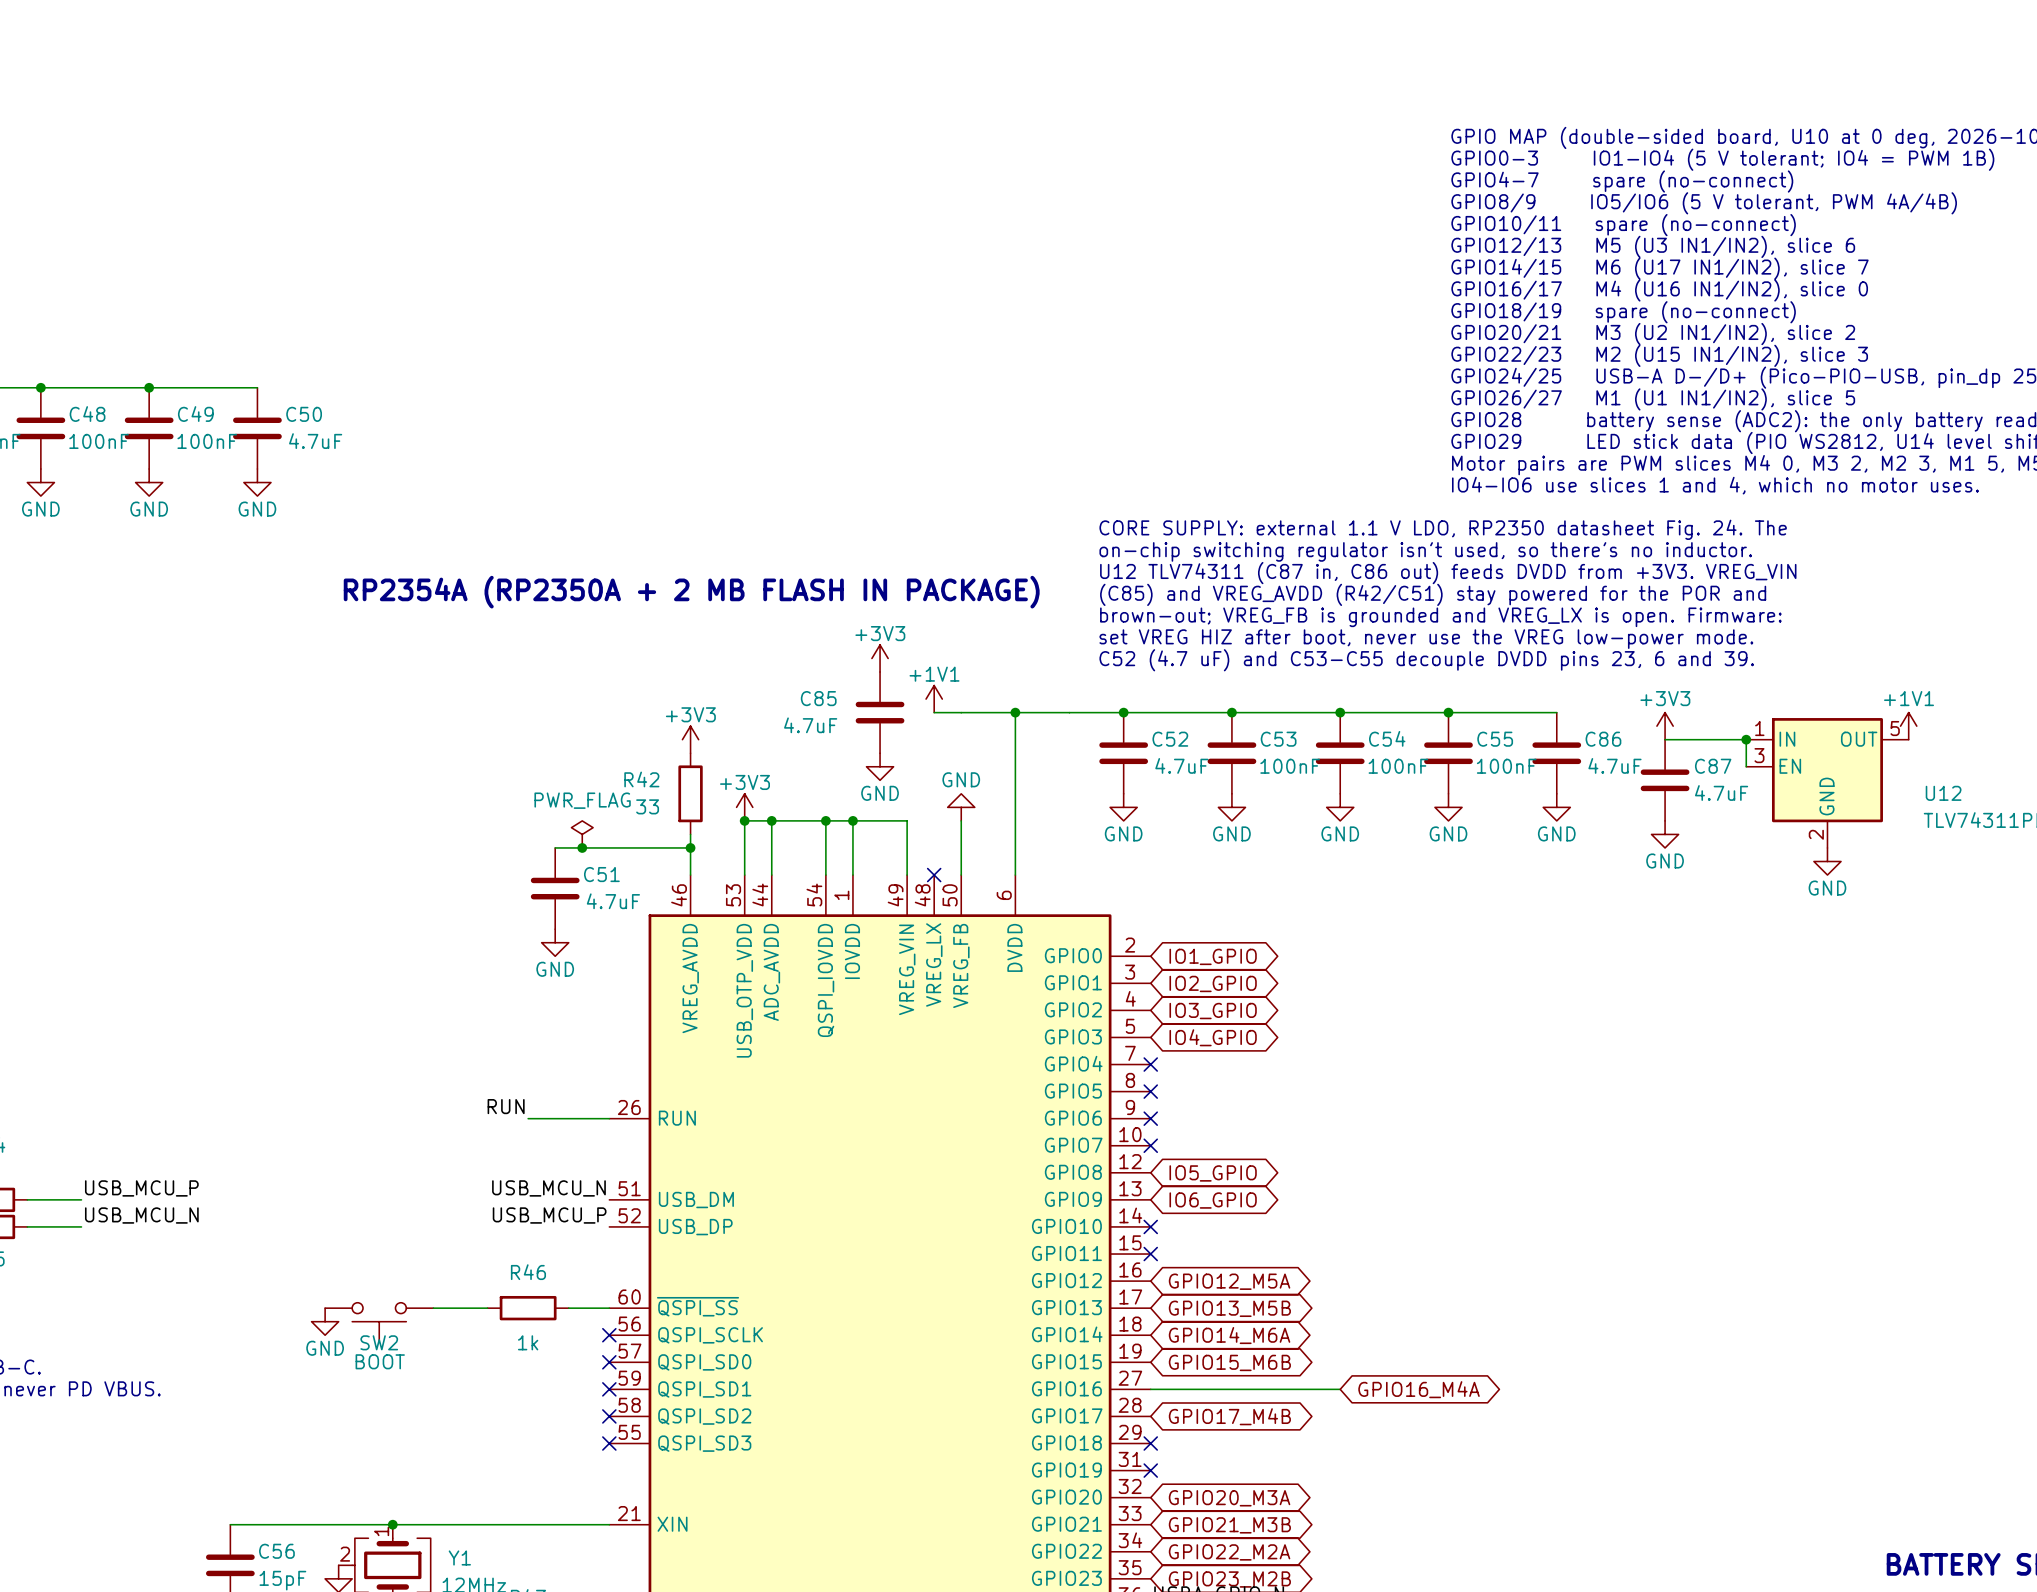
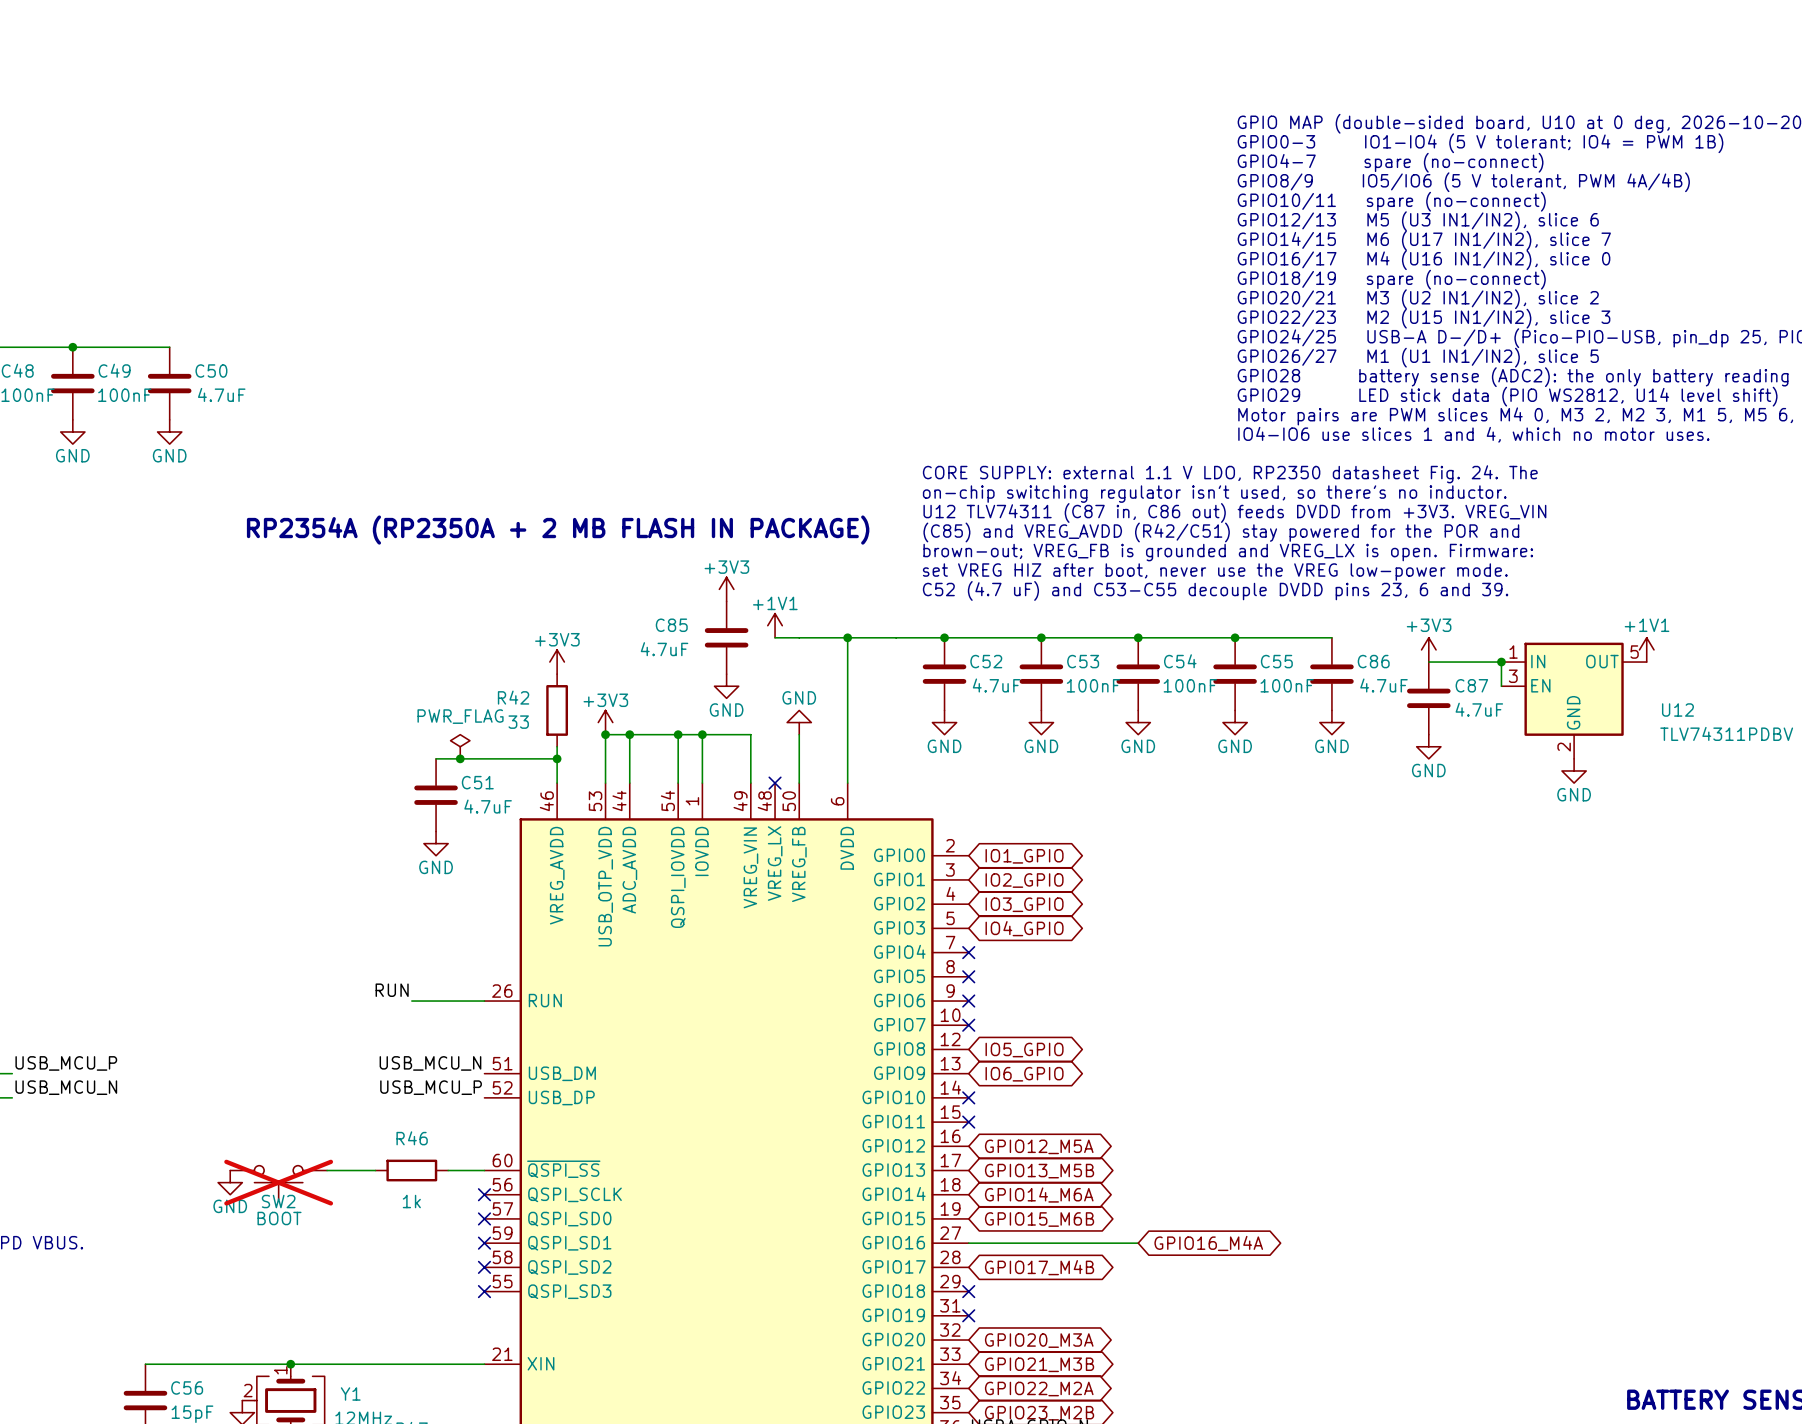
SW2 do-not-place cross: none -> (278, 1182)

